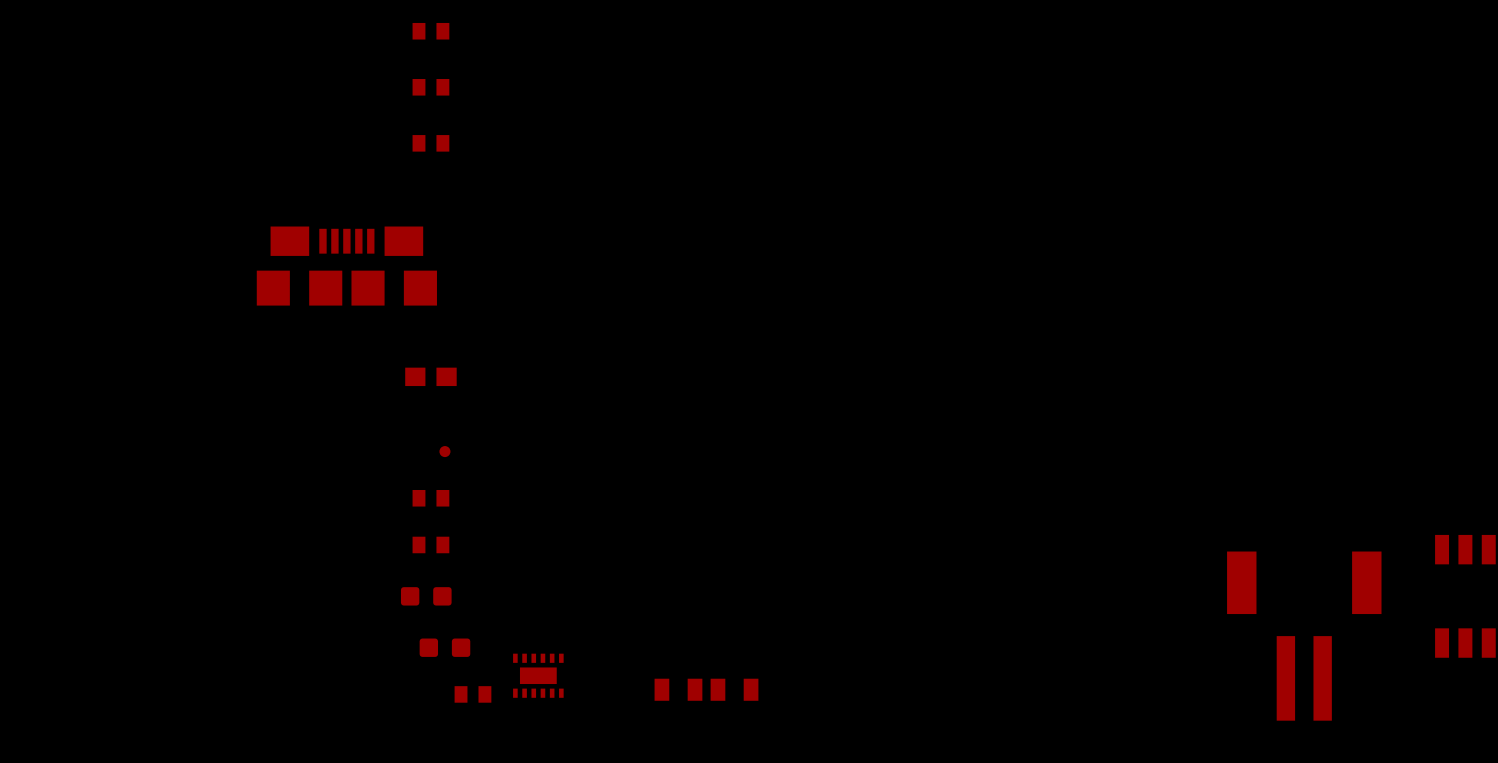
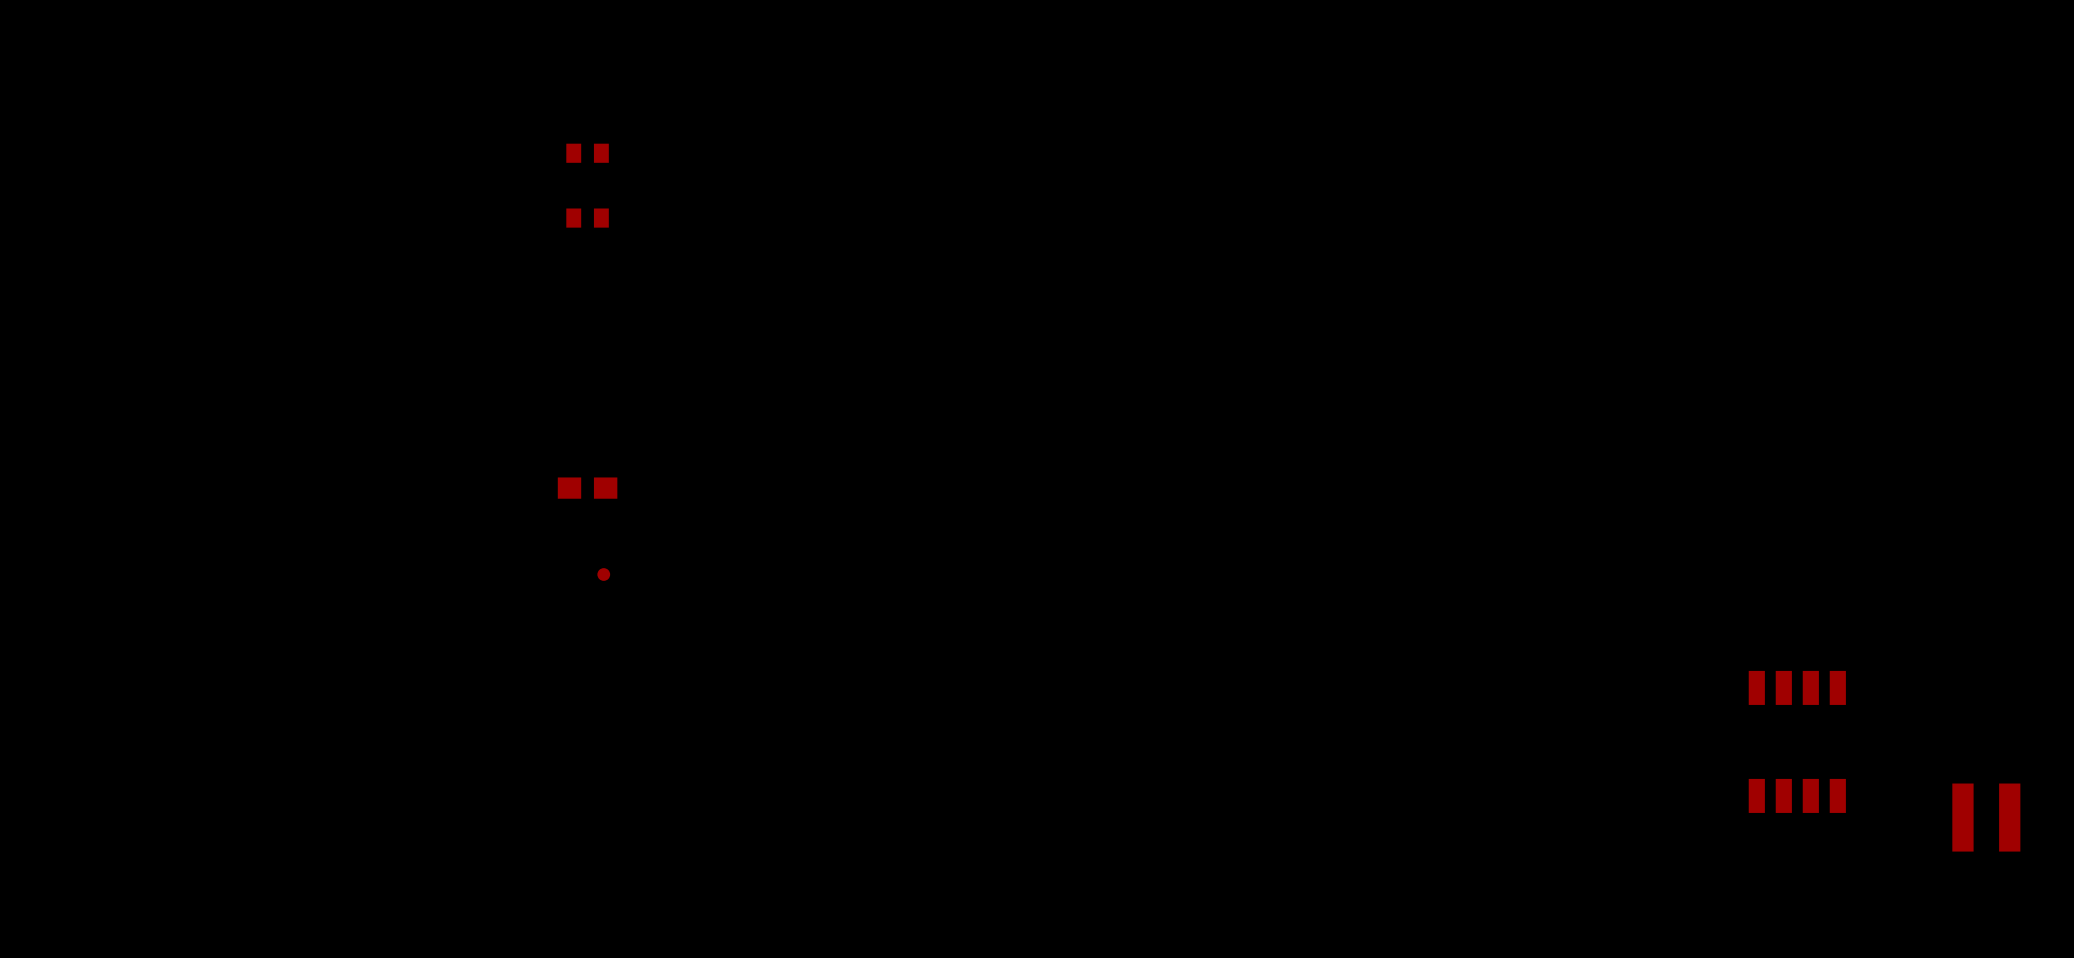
part: (430, 31) -> none
part: (346, 266) -> none
part: (430, 498) -> none
part: (430, 544) -> none
part: (426, 596) -> none
part: (1304, 636) -> none
part: (444, 647) -> none
part: (538, 675) -> none
part: (678, 689) -> none
part: (734, 689) -> none
part: (472, 694) -> none

